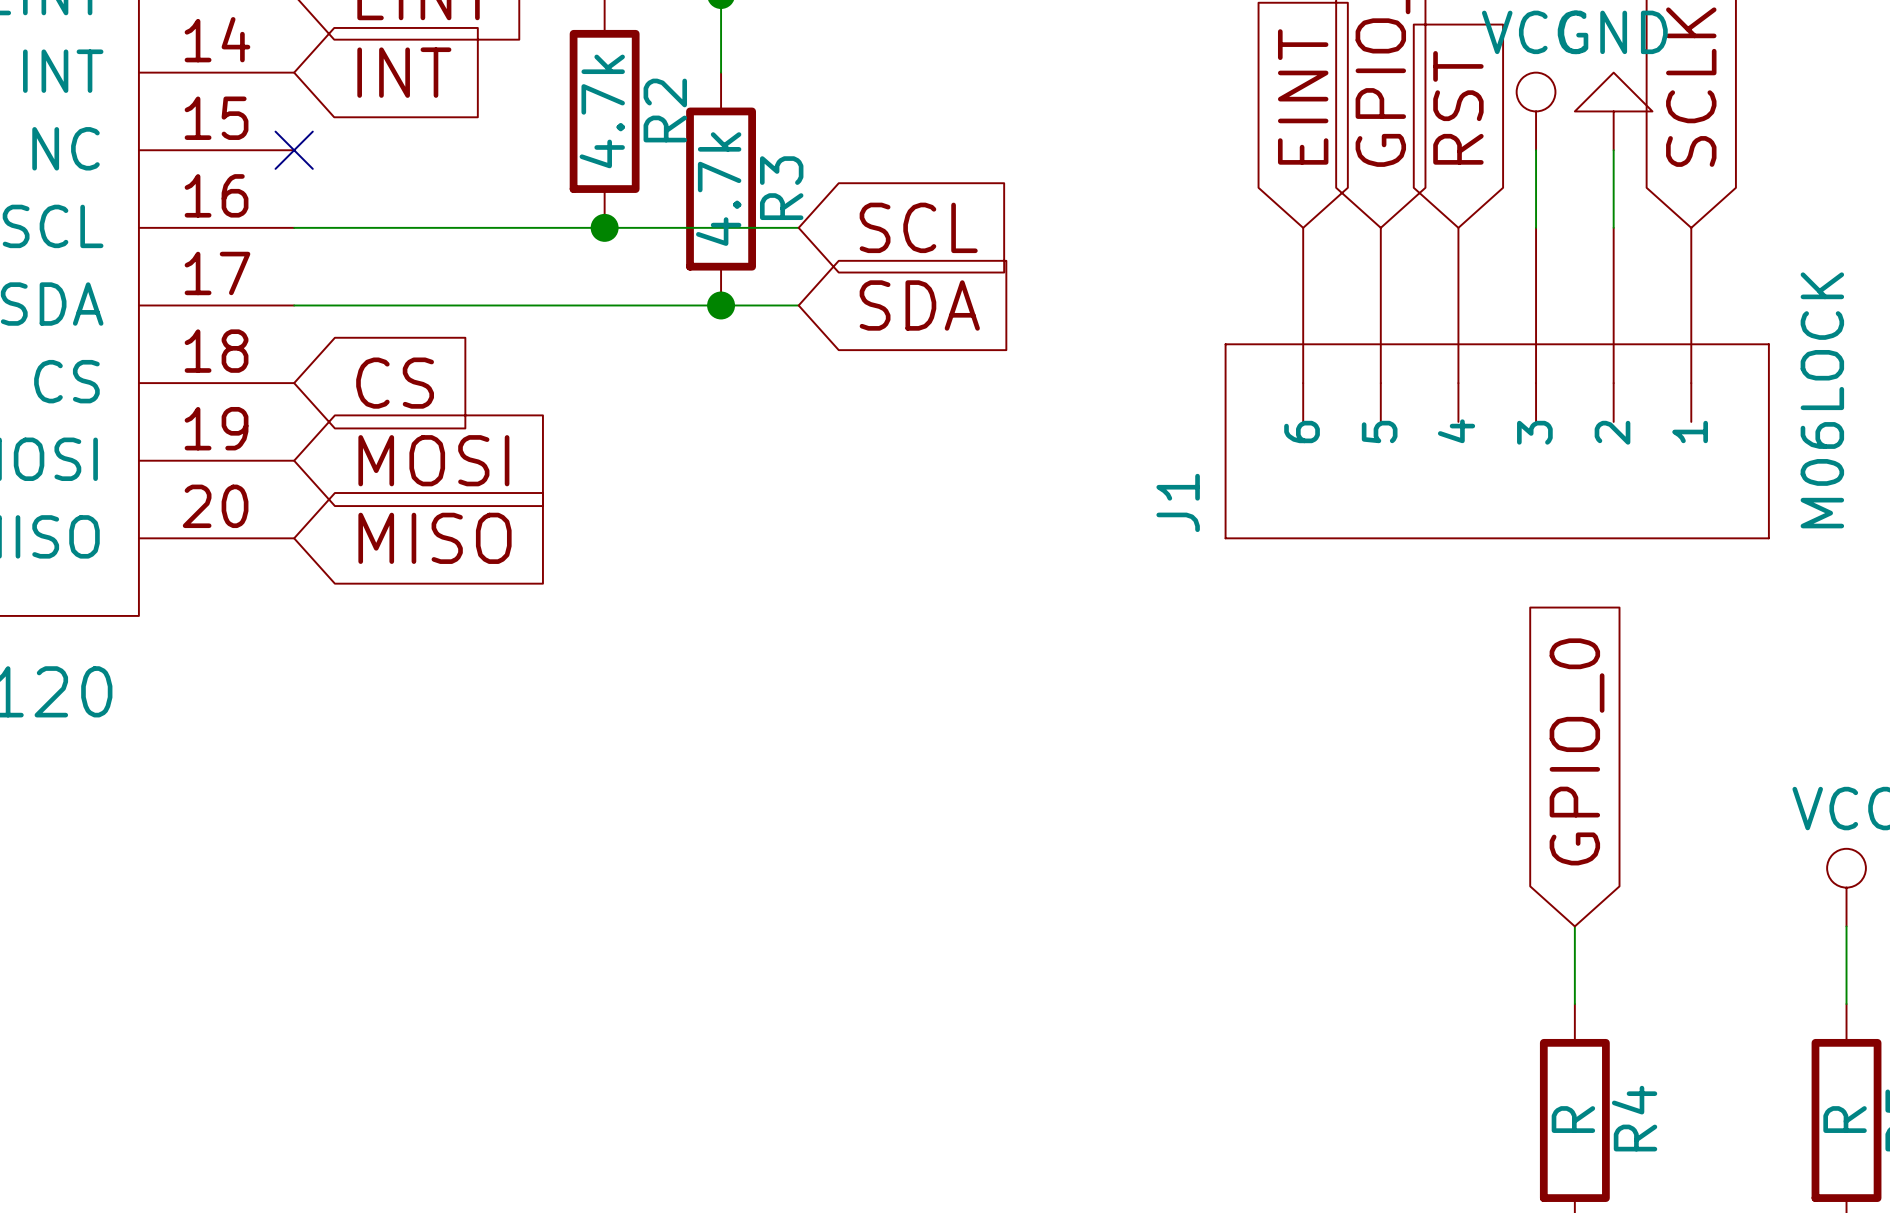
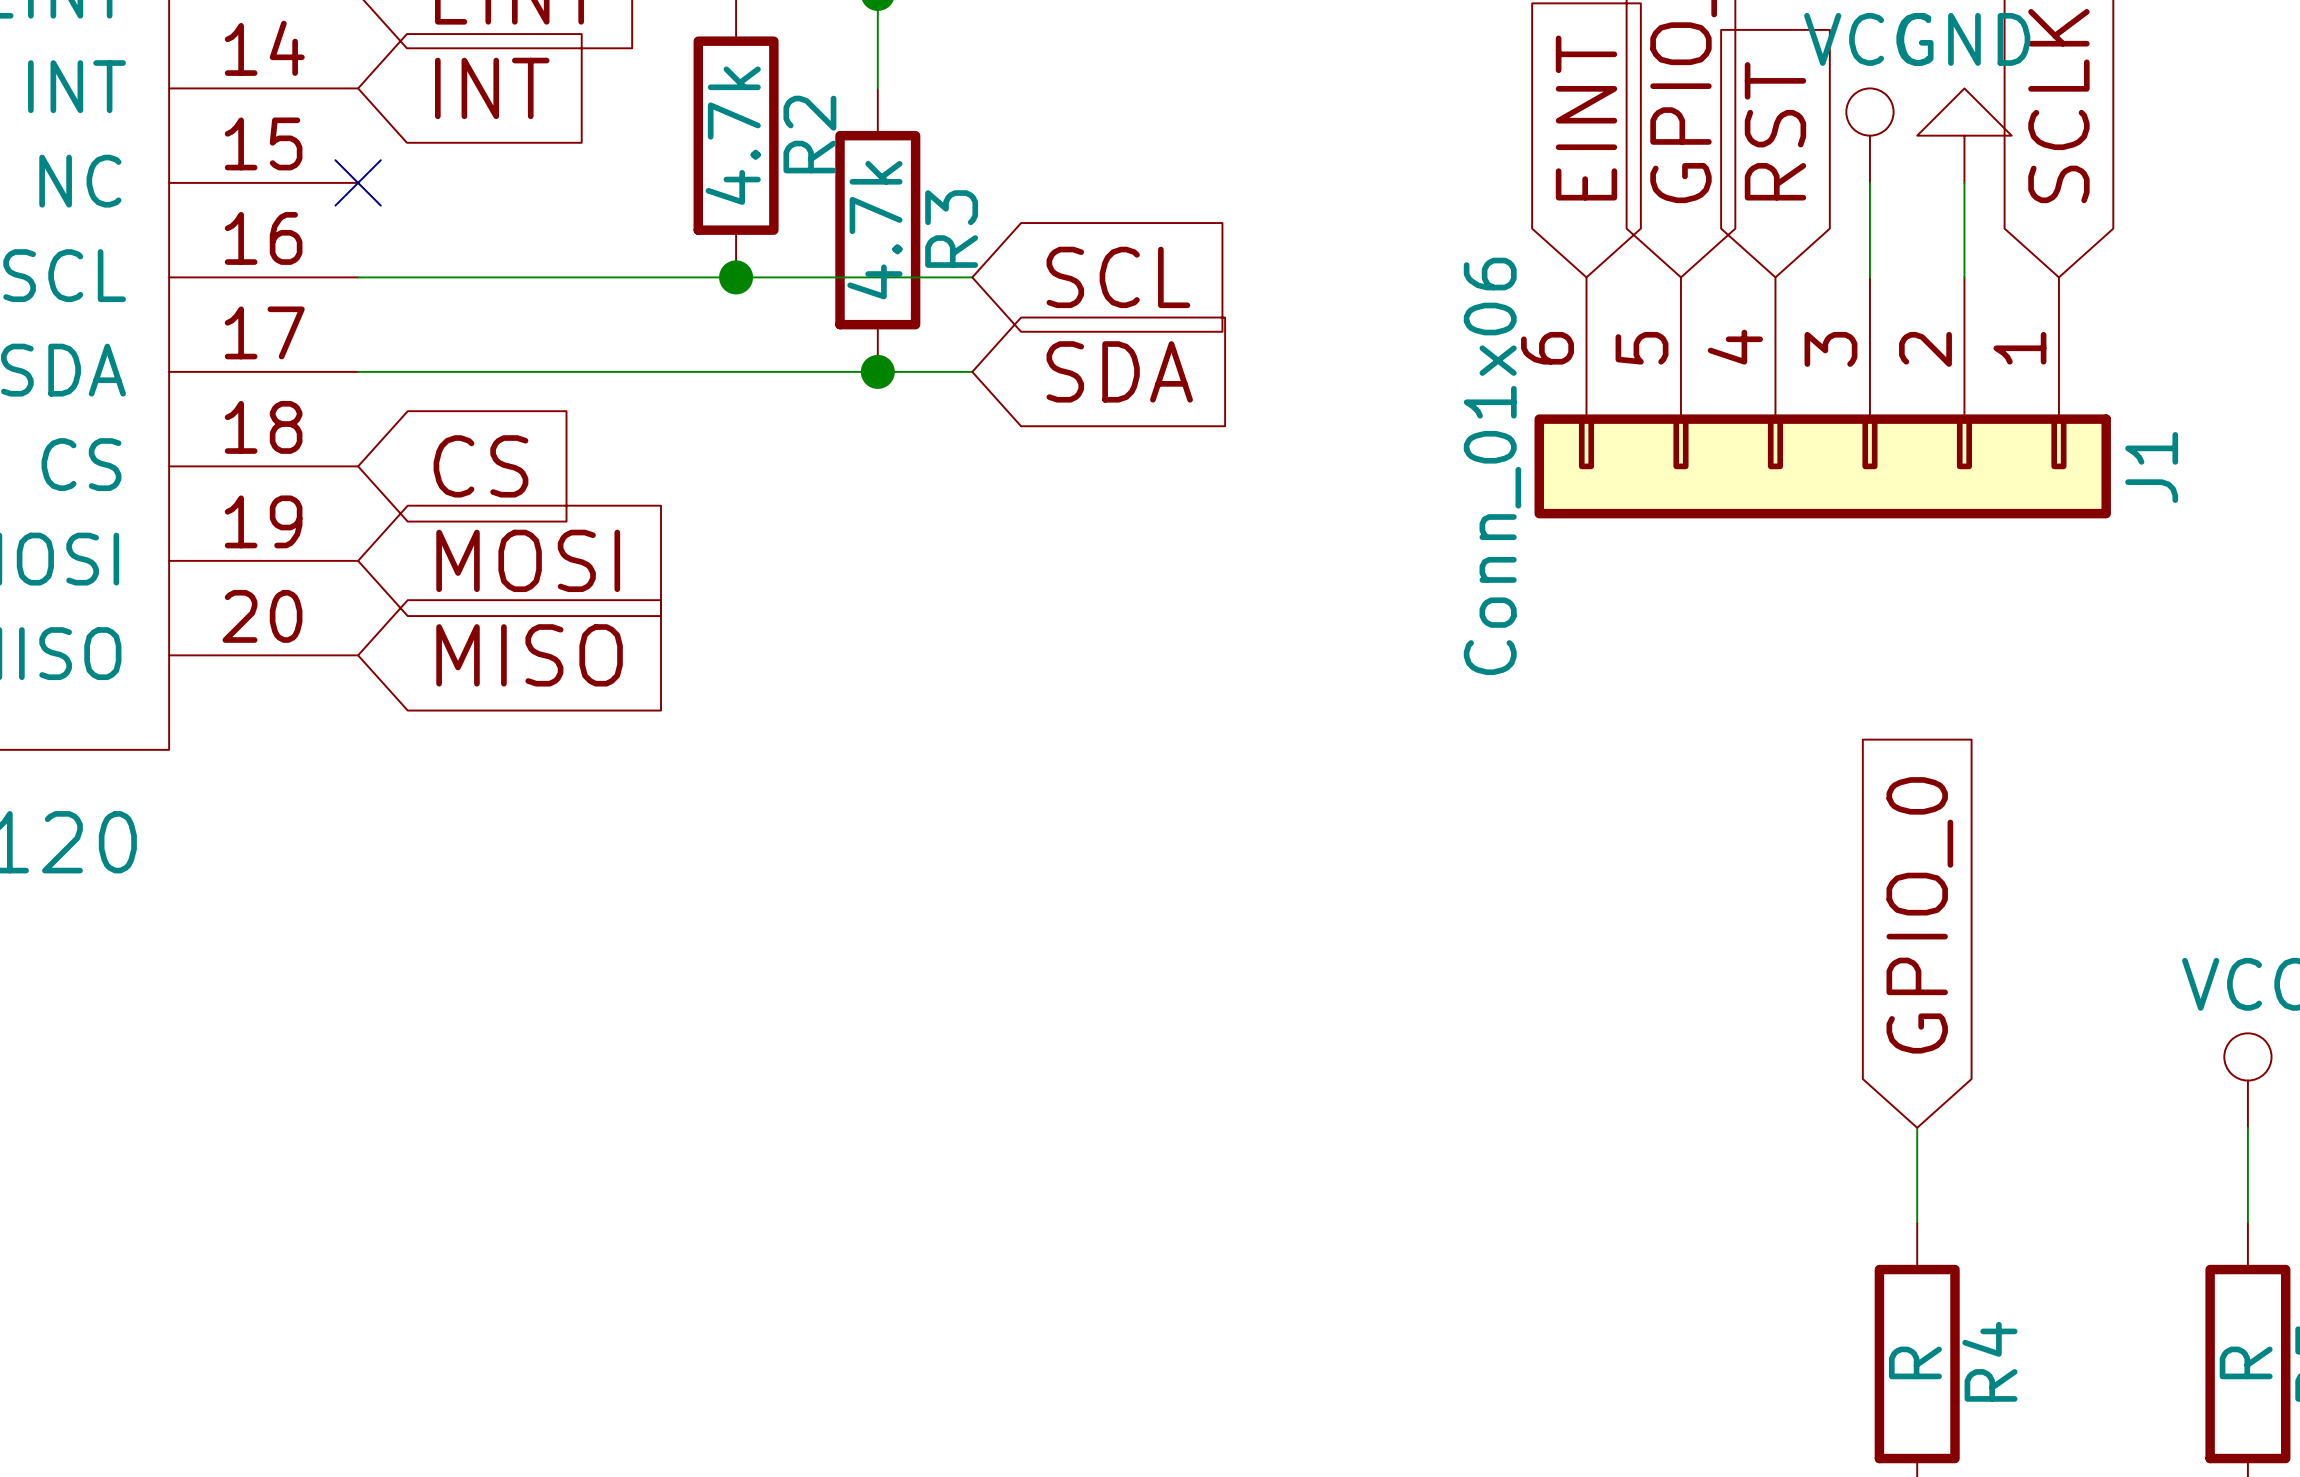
J1 symbol: [1225, 227, 1769, 539] -> [1534, 277, 2111, 519]
J1 value: M06LOCK (1822, 400) -> Conn_01x06 (1492, 466)
J1 name position: J1 (1178, 502) -> J1 (2151, 467)

